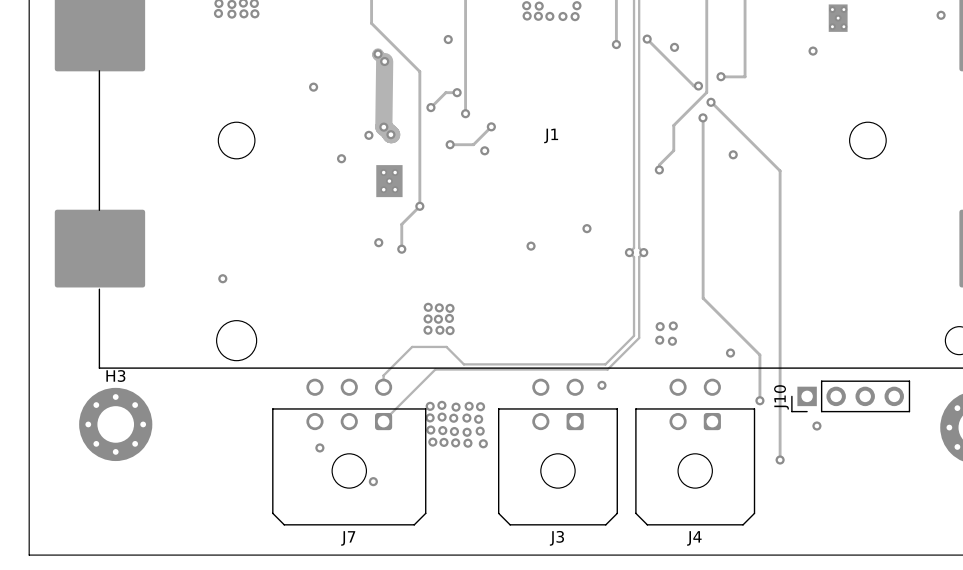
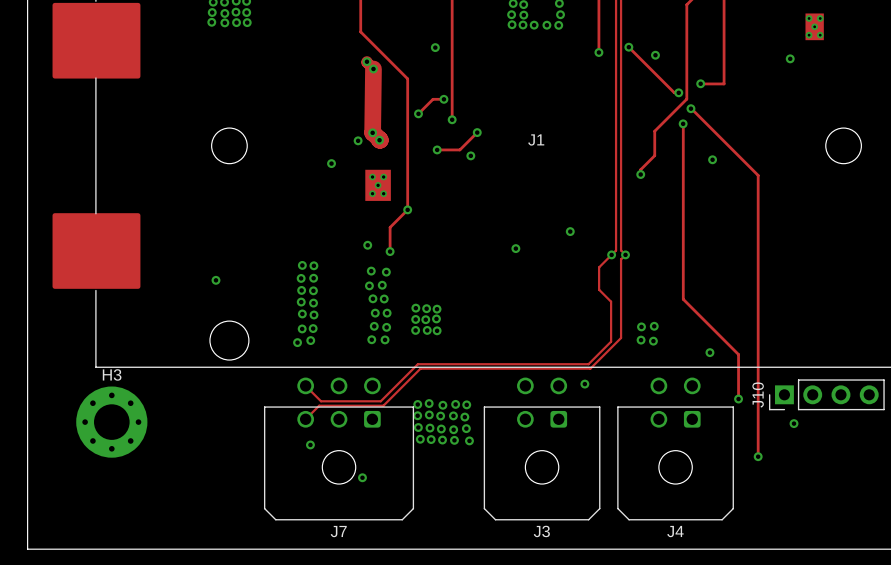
via: (313, 87) -> none
track: (629, 252) (634, 257) (634, 335) (605, 364) (463, 364) (446, 346) (412, 346) (383, 375) (383, 387) -> (611, 254) (599, 267) (599, 289) (611, 301) (611, 341) (588, 364) (417, 364) (380, 401) (321, 401) (305, 385)
via: none -> (302, 265)
via: none -> (313, 265)
via: none -> (371, 271)
via: none -> (386, 272)
via: none -> (301, 278)
via: none -> (313, 278)
via: none -> (382, 285)
via: none -> (369, 285)
via: none -> (301, 290)
via: none -> (313, 290)
via: none -> (372, 298)
via: none -> (384, 298)
via: none -> (301, 302)
via: none -> (313, 303)
via: none -> (375, 313)
via: none -> (387, 313)
via: none -> (302, 313)
via: none -> (313, 314)
via: none -> (374, 326)
via: none -> (386, 327)
via: none -> (302, 328)
via: none -> (313, 328)
via: none -> (371, 339)
via: none -> (385, 339)
via: none -> (310, 340)
via: none -> (297, 342)
track: (435, 369) (383, 421) -> (422, 368) (420, 368) (383, 405) (319, 405) (305, 419)

